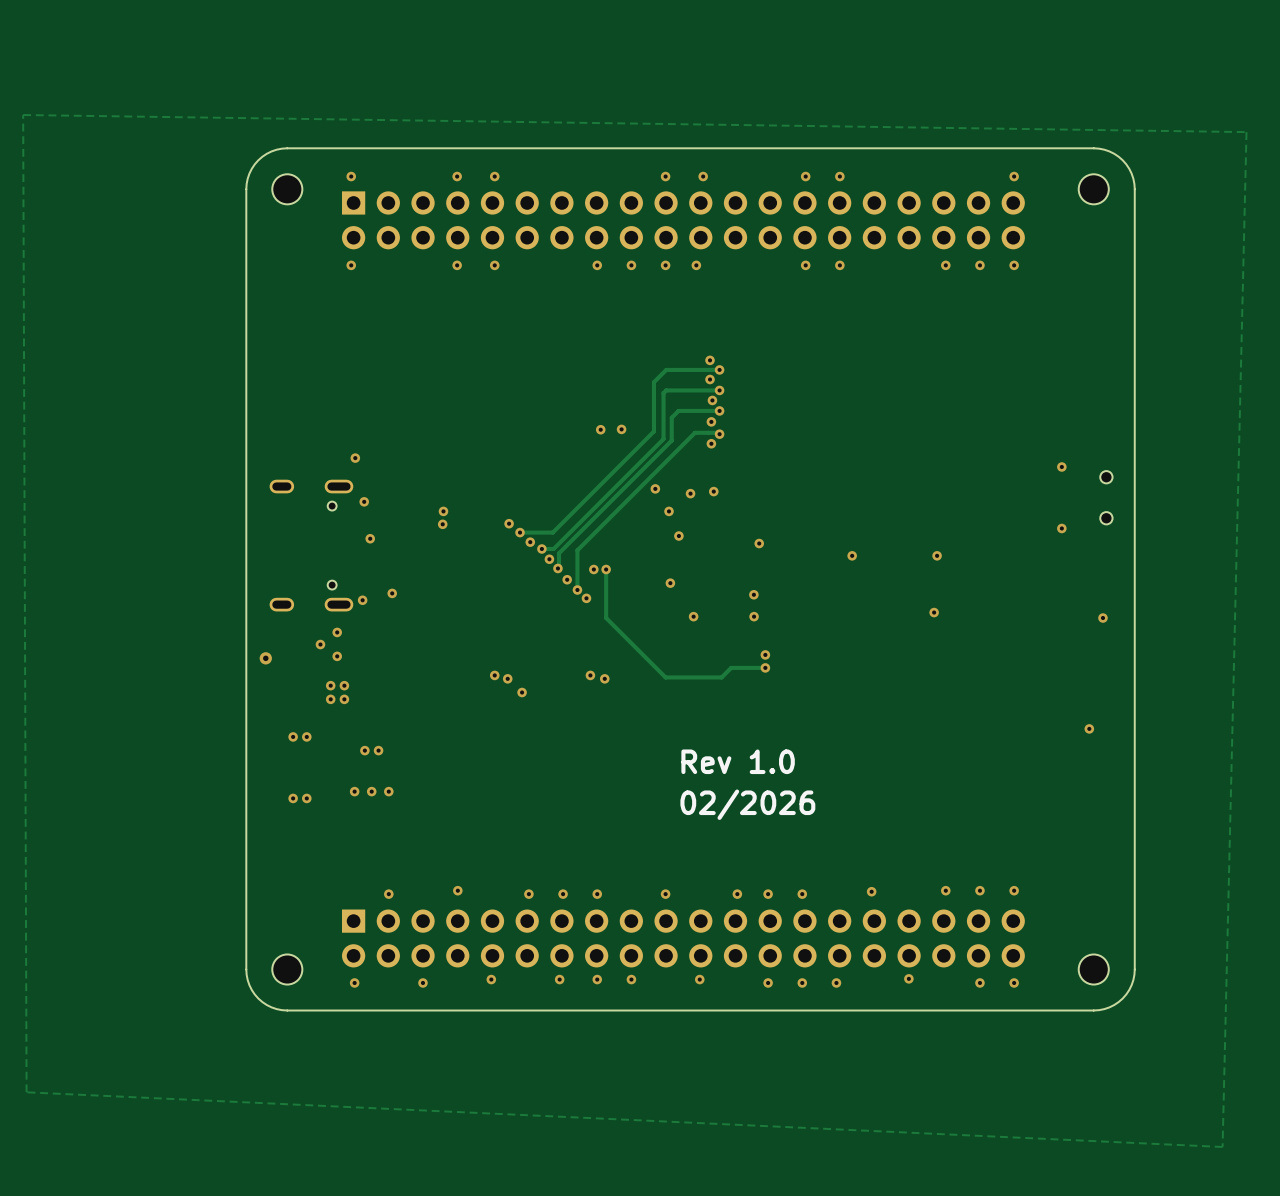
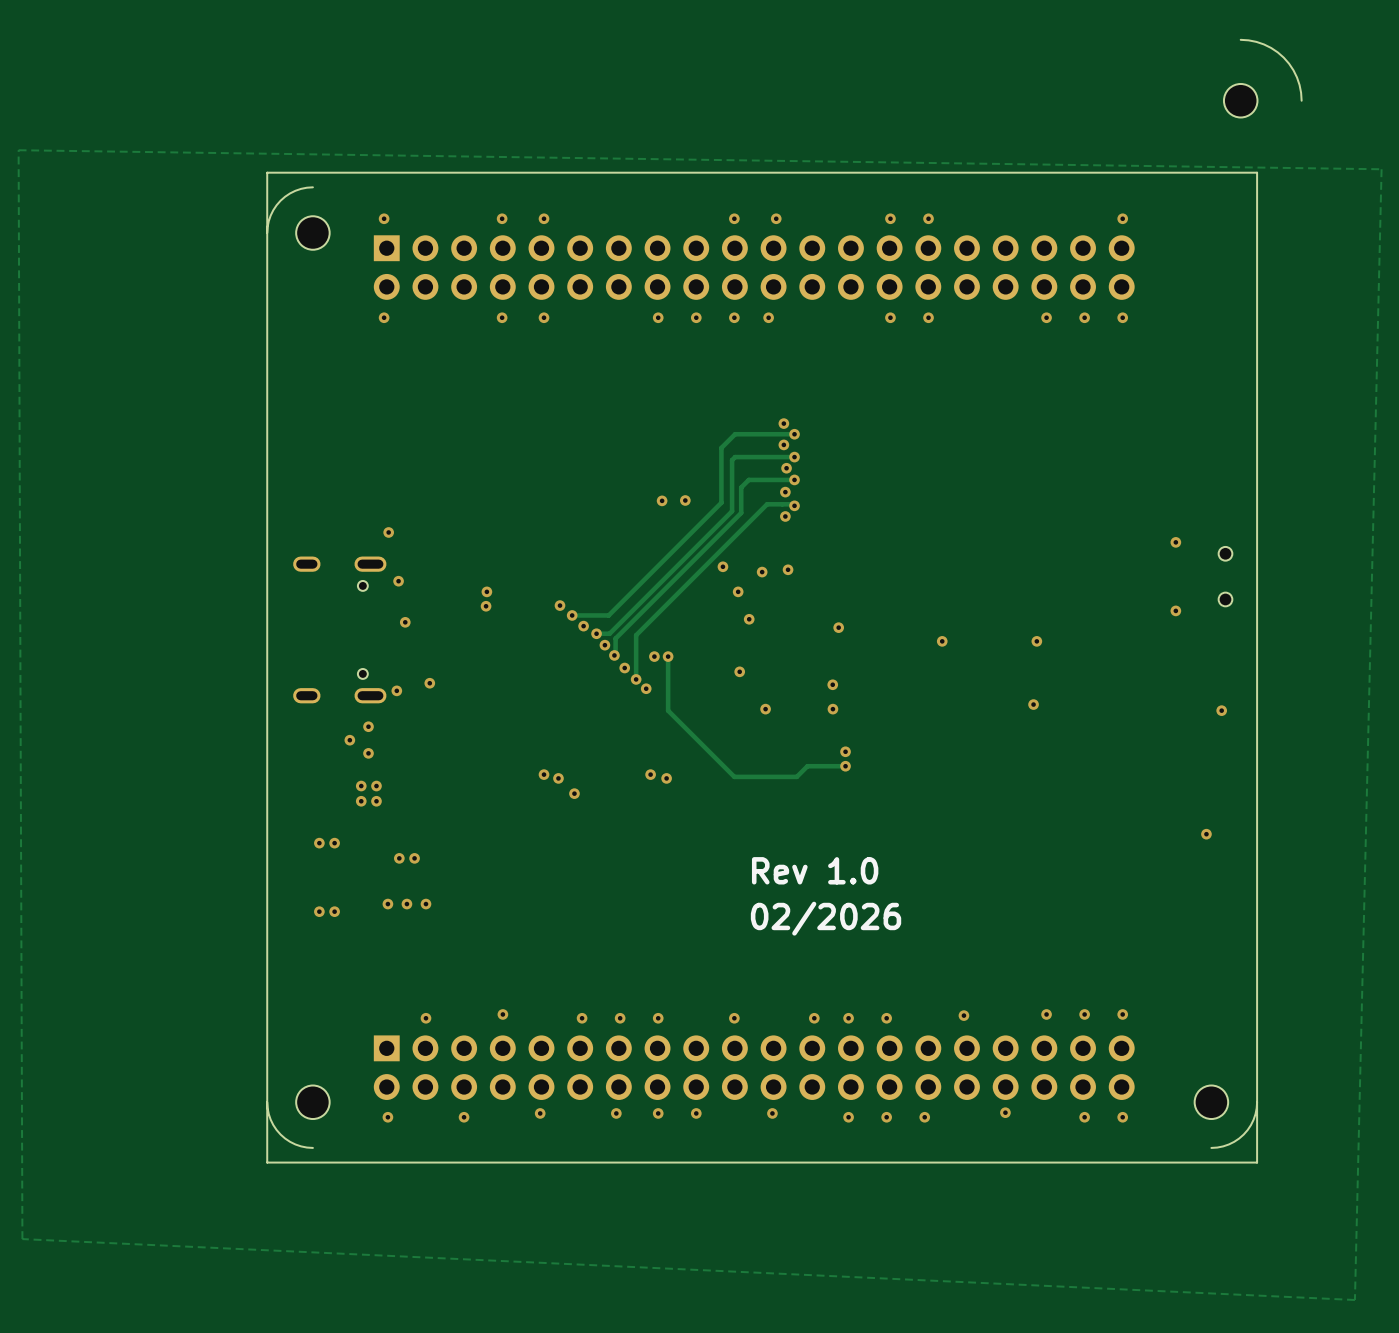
board edge: none -> (1240, 39) (1264, 44) (1283, 57) (1297, 77) (1301, 100)
board edge: (287, 148) (1093, 148) (1109, 151) (1122, 160) (1131, 173) (1134, 189) -> (267, 233) (267, 172) (1257, 172) (1257, 233)
part position: (1093, 189) -> (1240, 100)
via: (265, 658) -> none
board edge: none -> (1257, 1102) (1257, 1162) (267, 1162) (267, 1102)
board edge: (1093, 1010) (287, 1010) -> none

